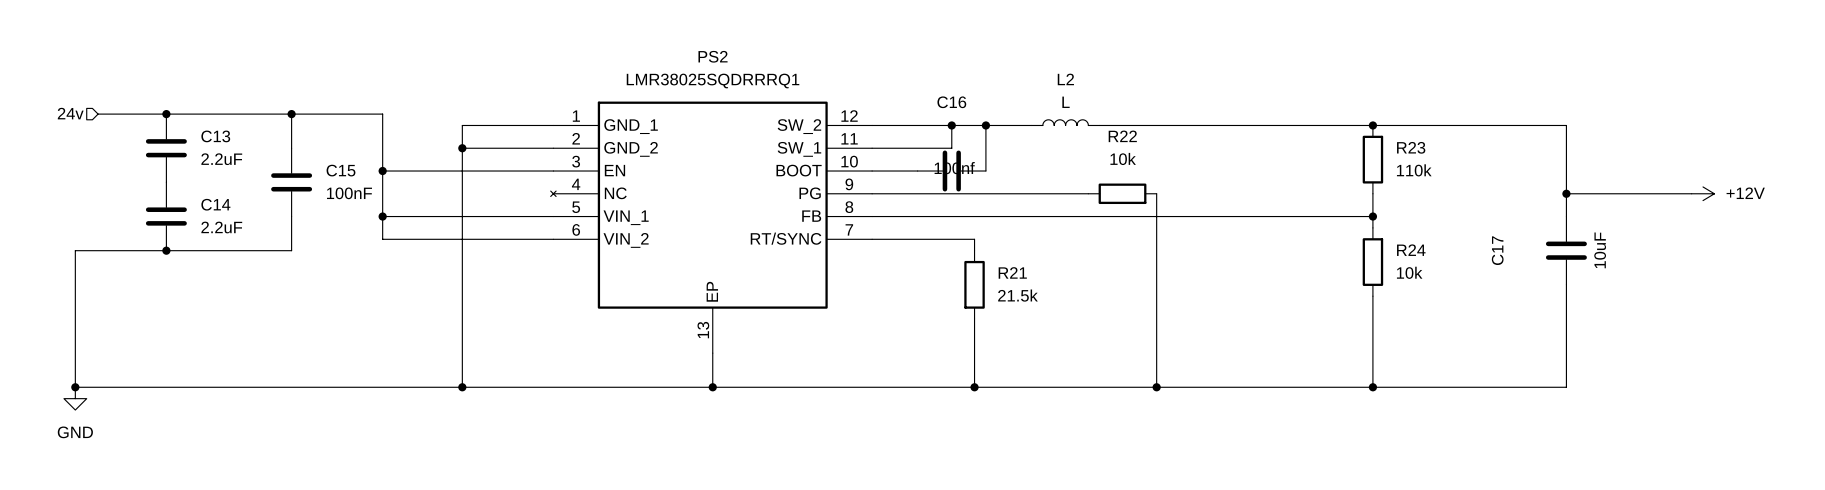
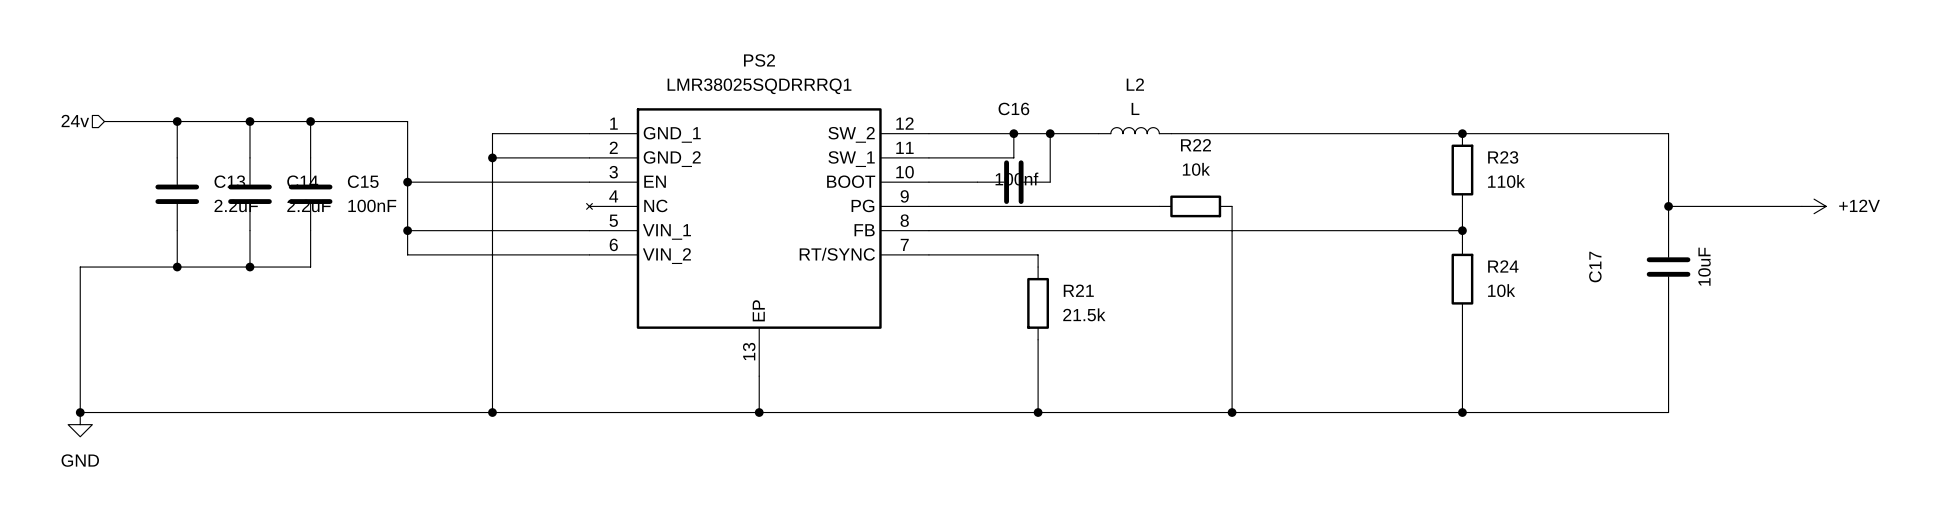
wire: none -> (249, 121) (249, 157)
junction: none -> (249, 121)
C13 position: (166, 148) -> (177, 194)
C14 position: (166, 216) -> (249, 194)
wire: none -> (249, 230) (249, 267)
junction: none -> (249, 267)

